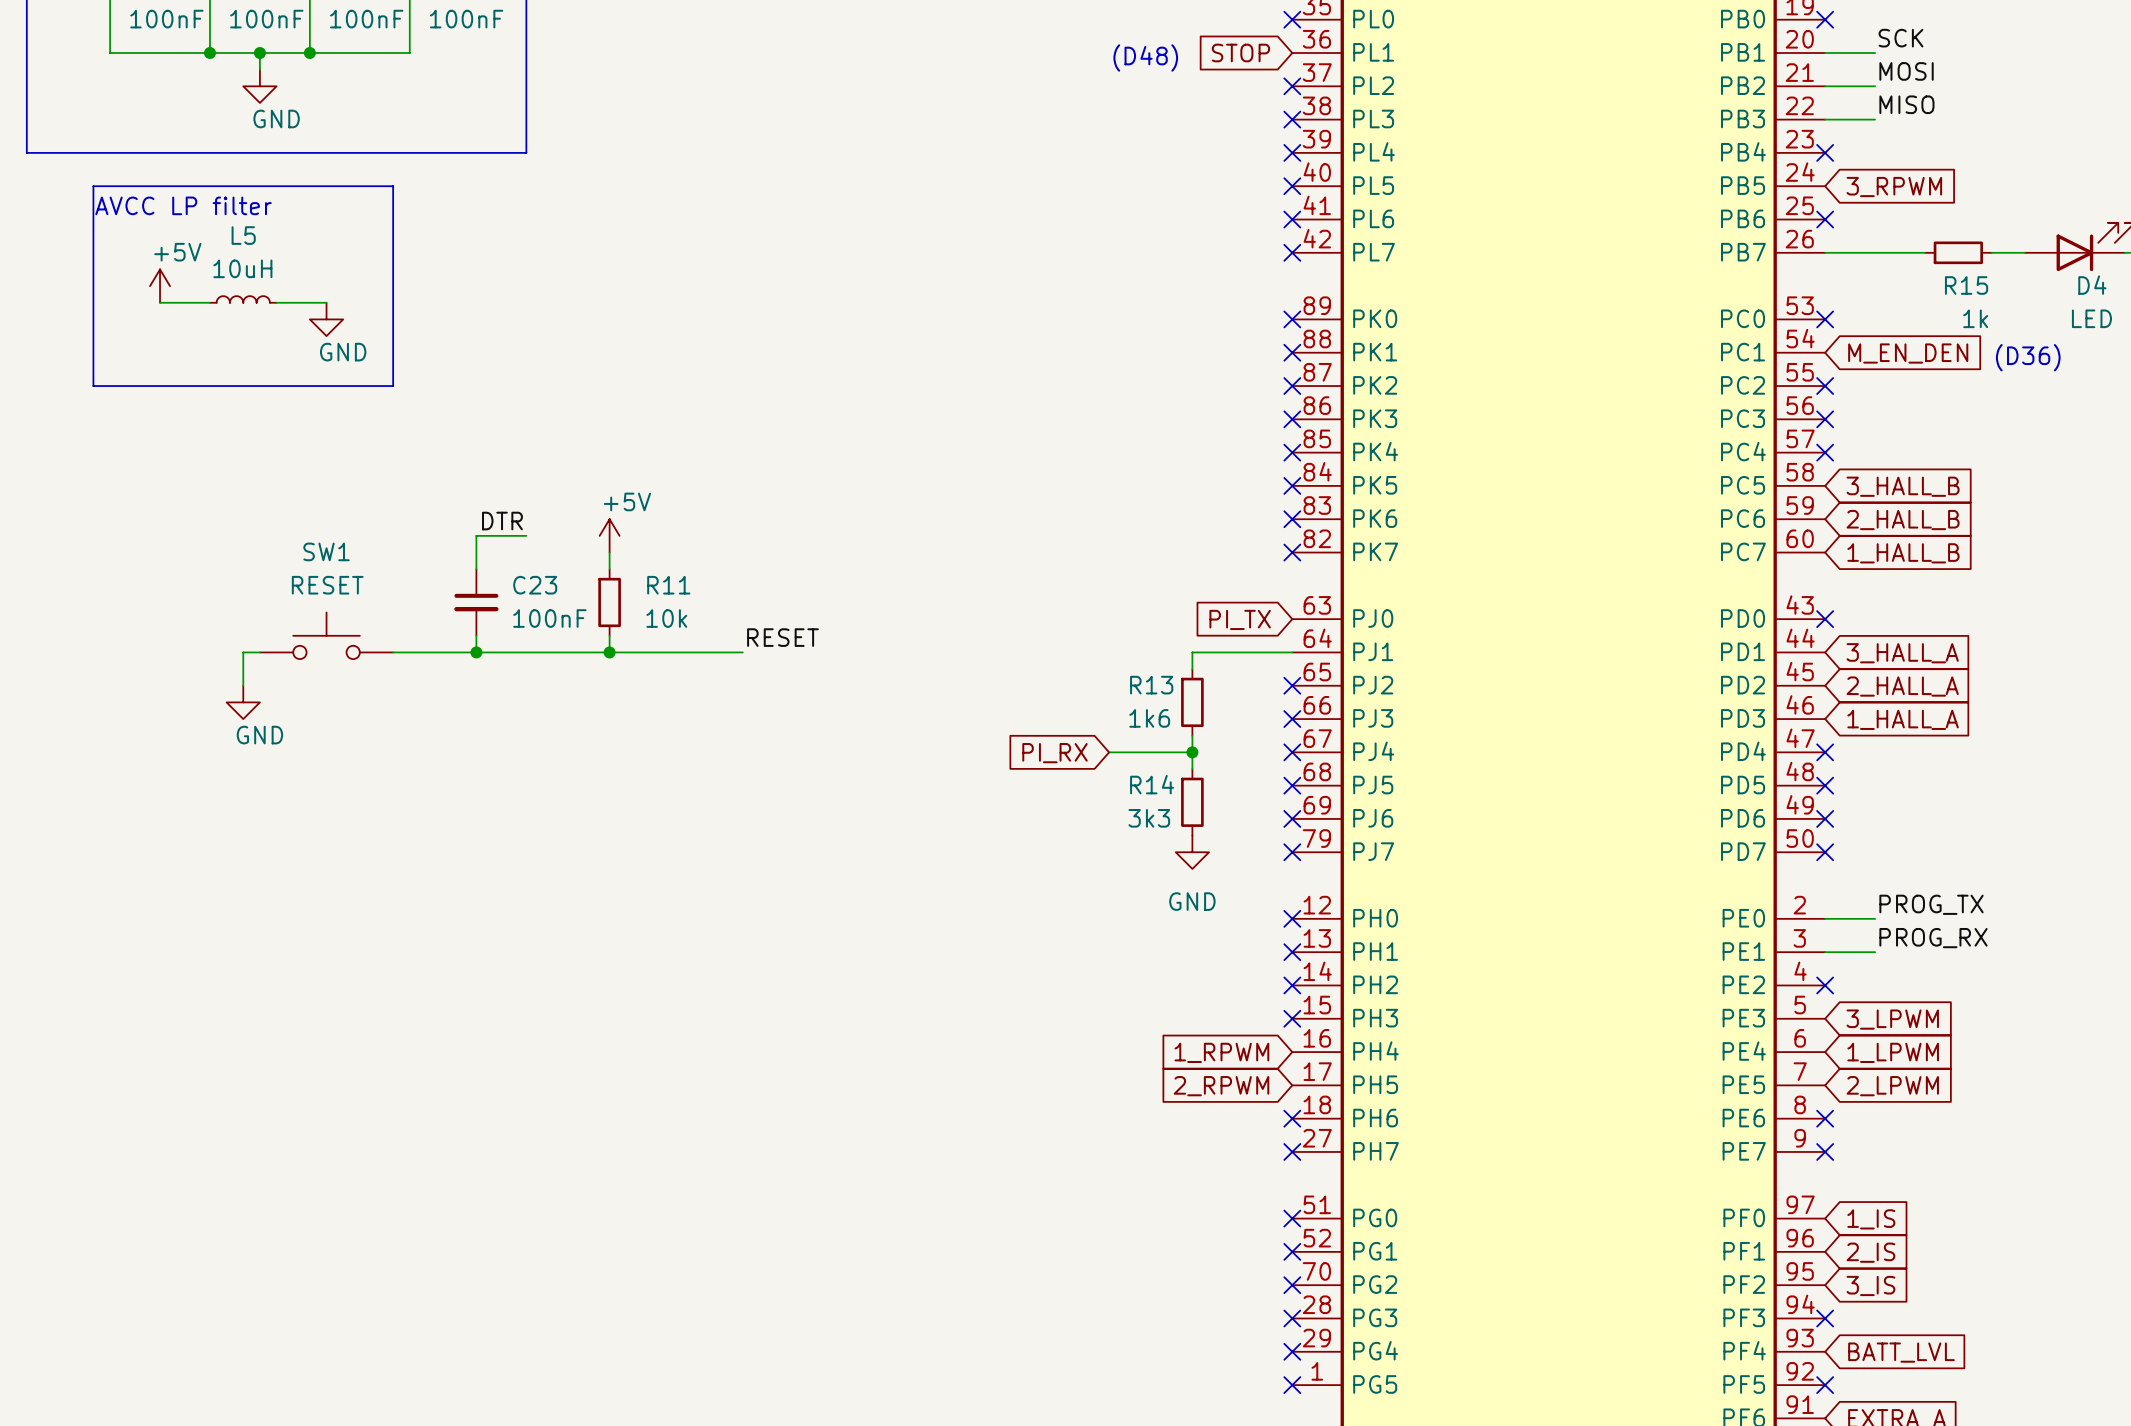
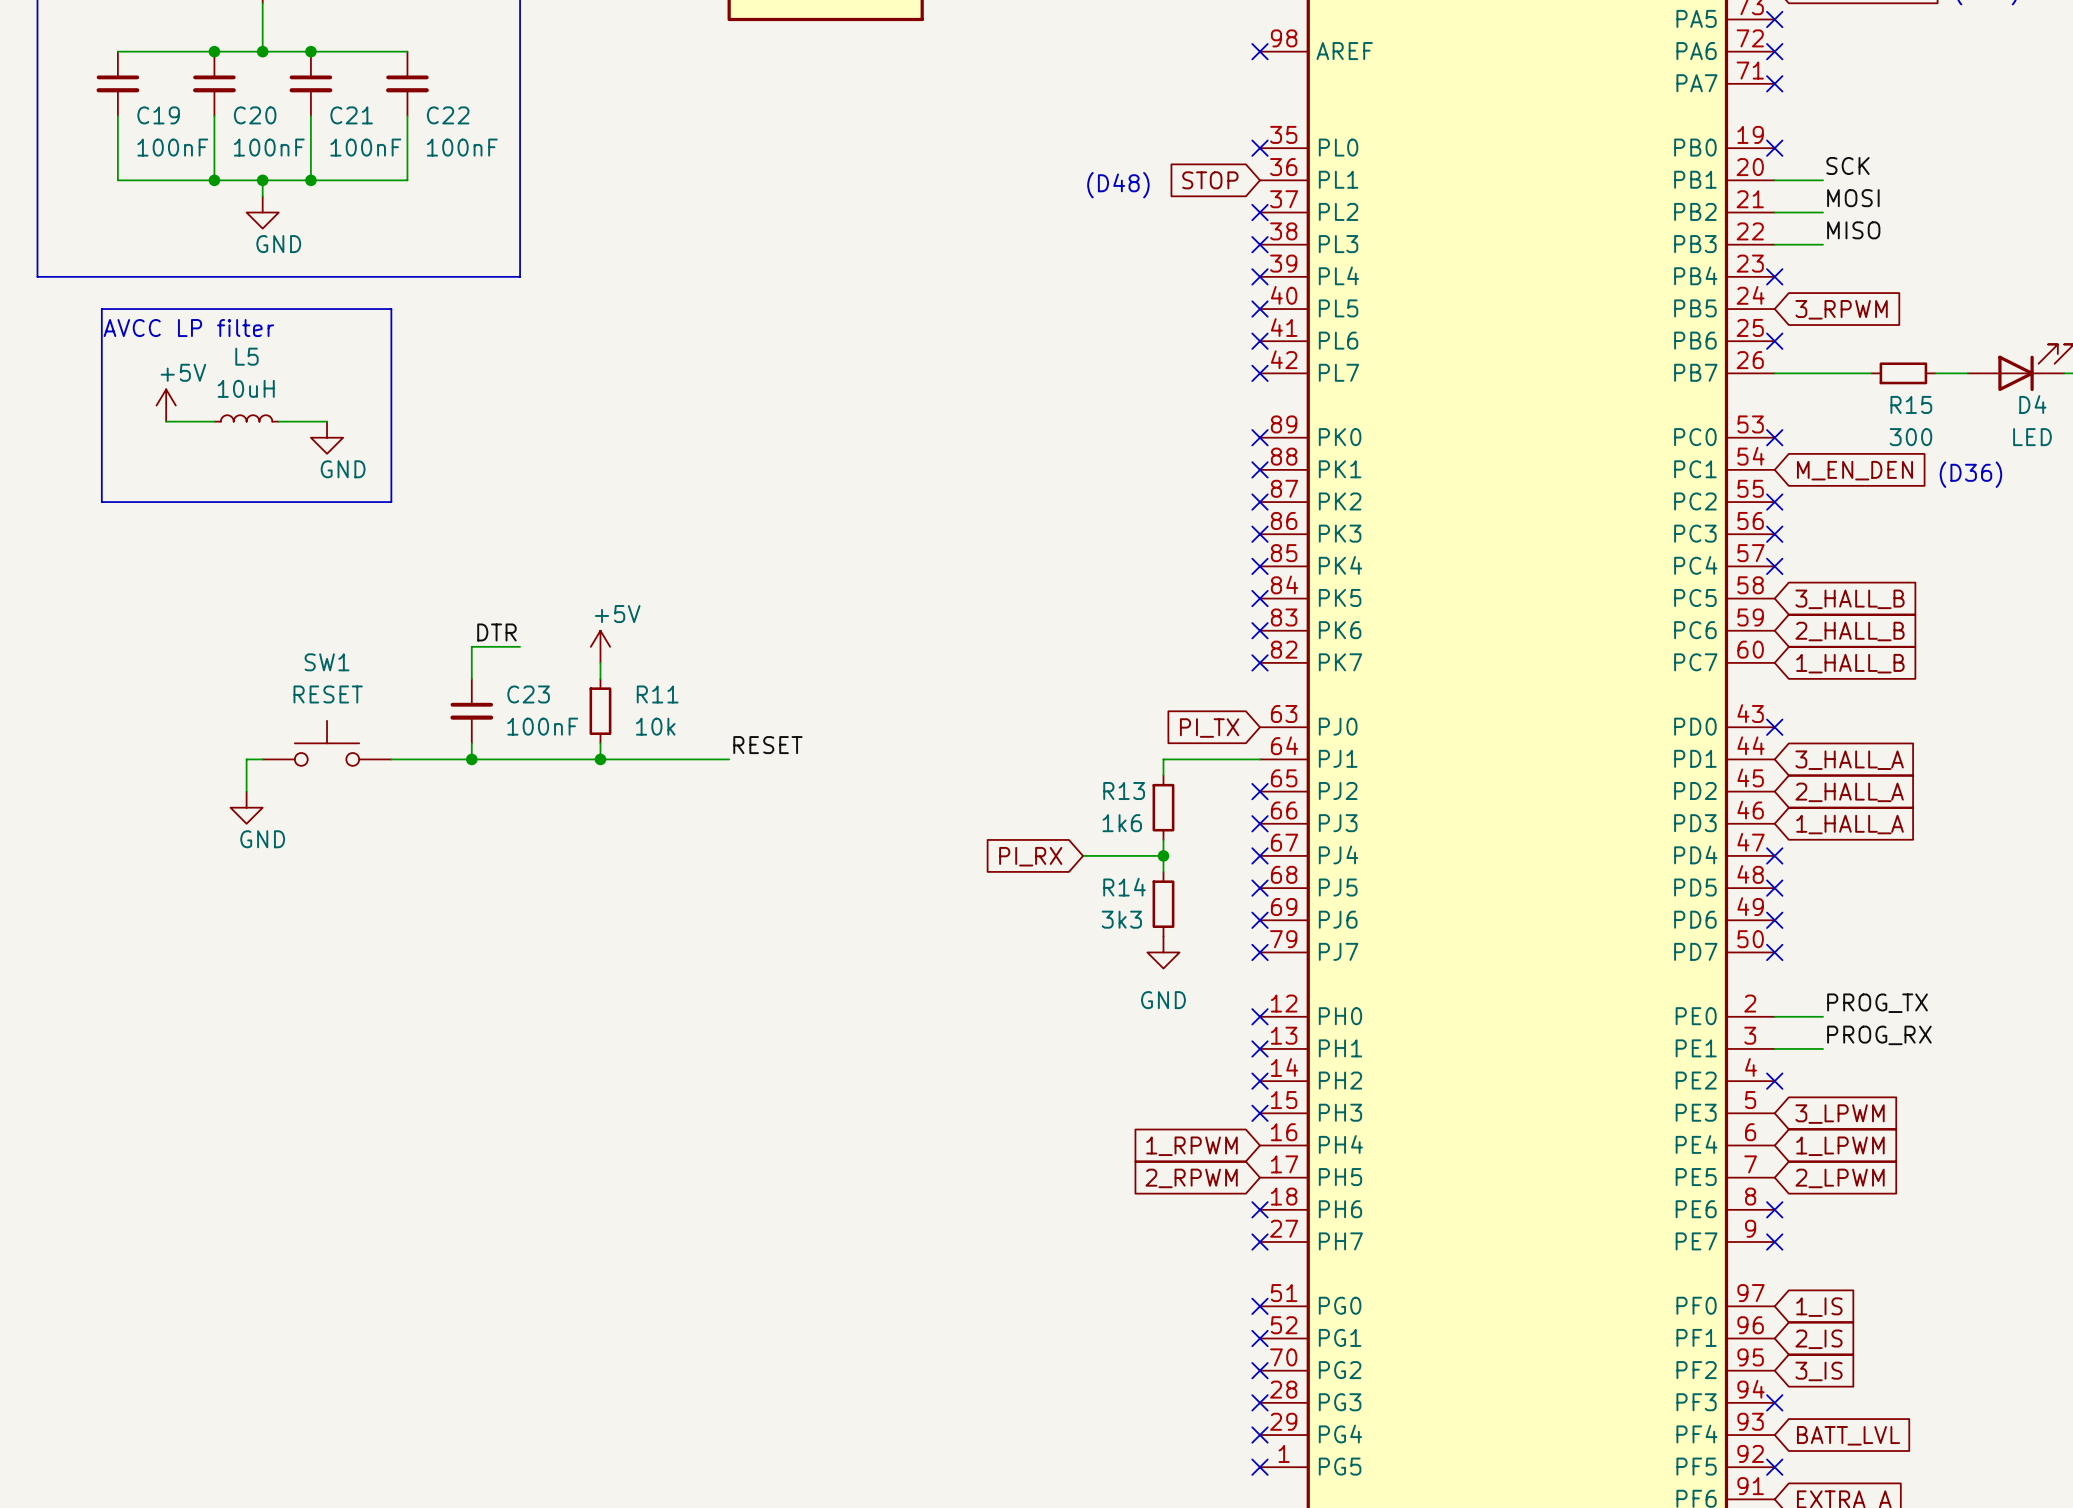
R15 value: 1k (1975, 318) -> 300 (1910, 437)

